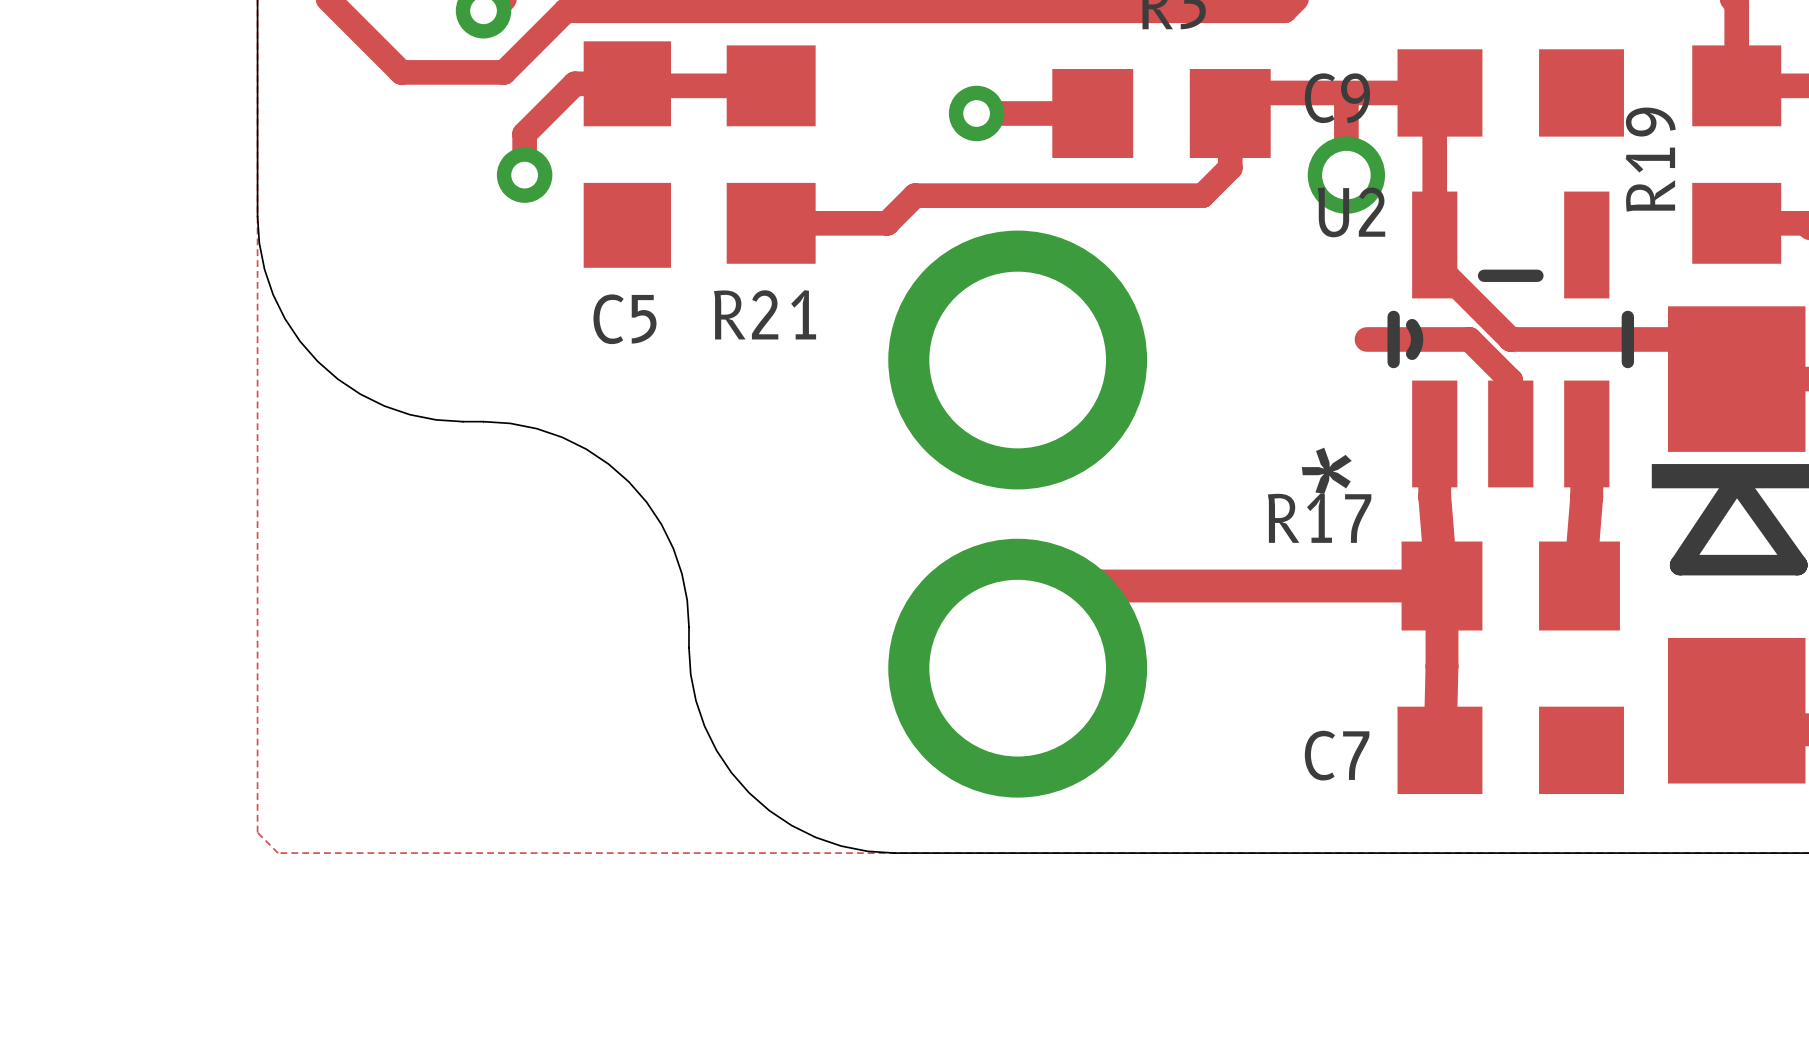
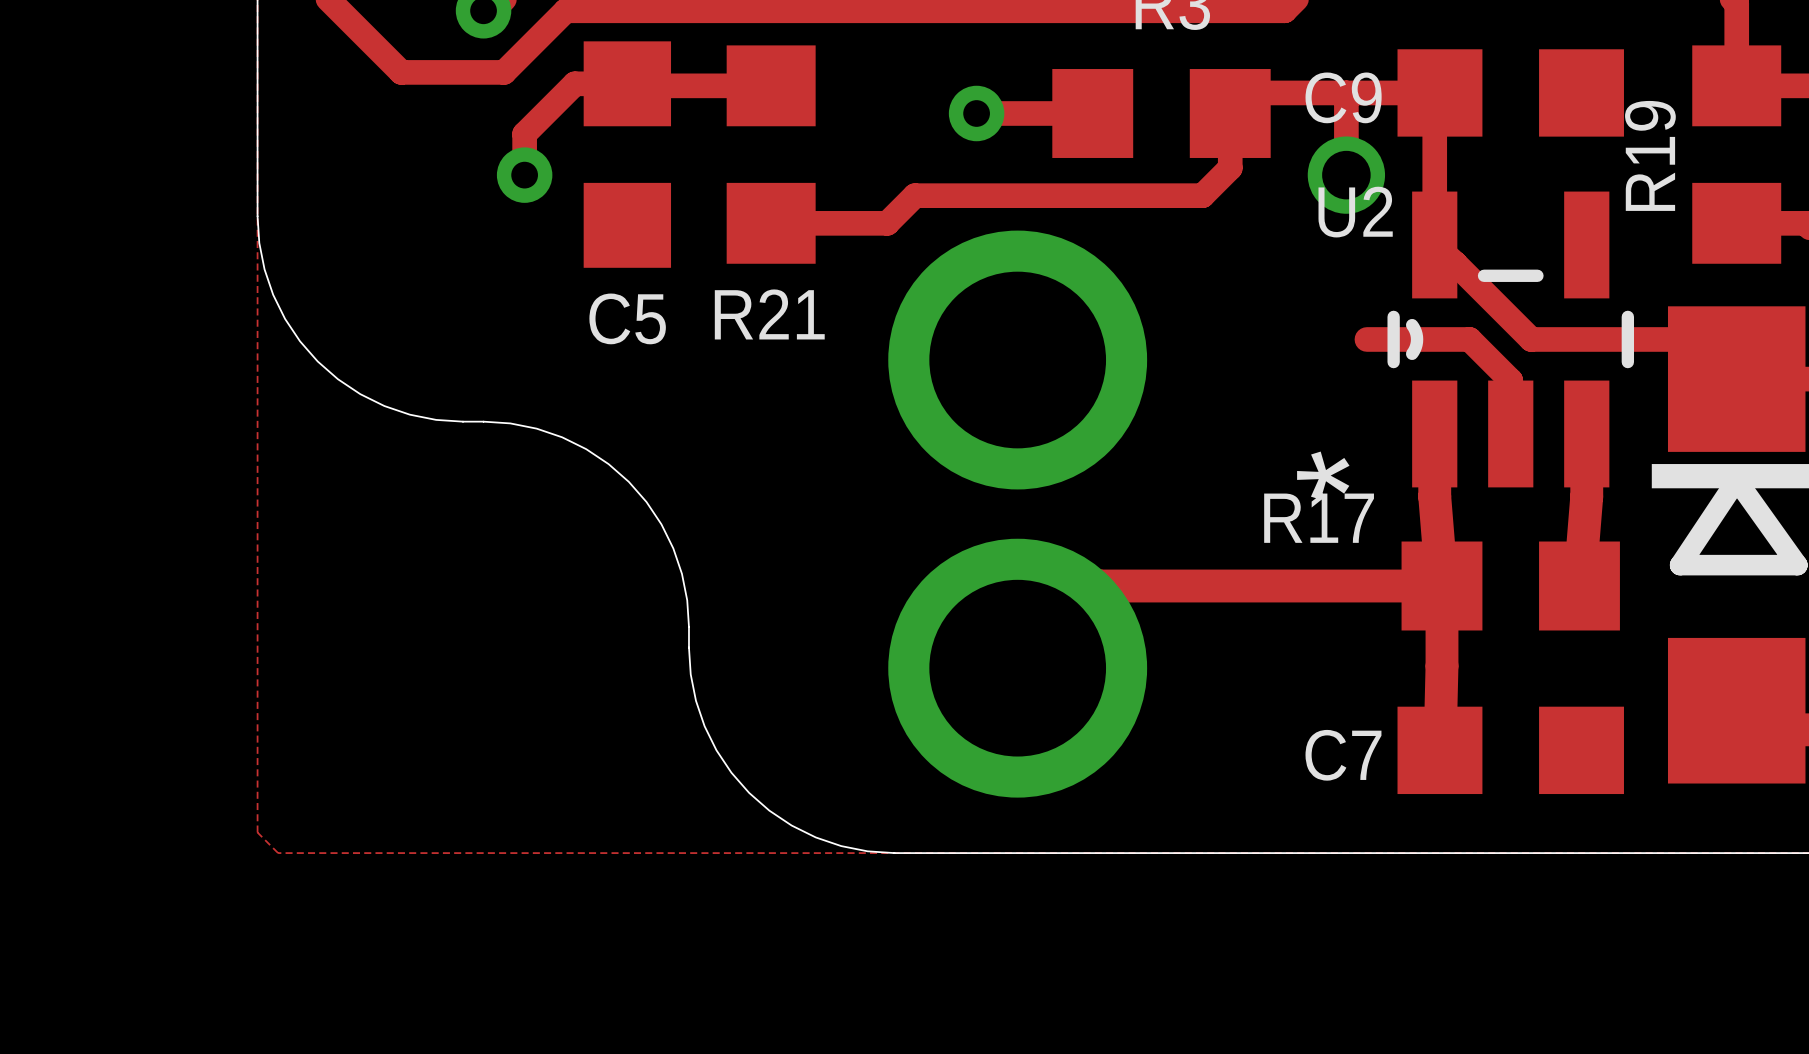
track: (1434, 244) (1434, 263) (1510, 339) (1531, 339) -> (1434, 244) (1531, 339)

